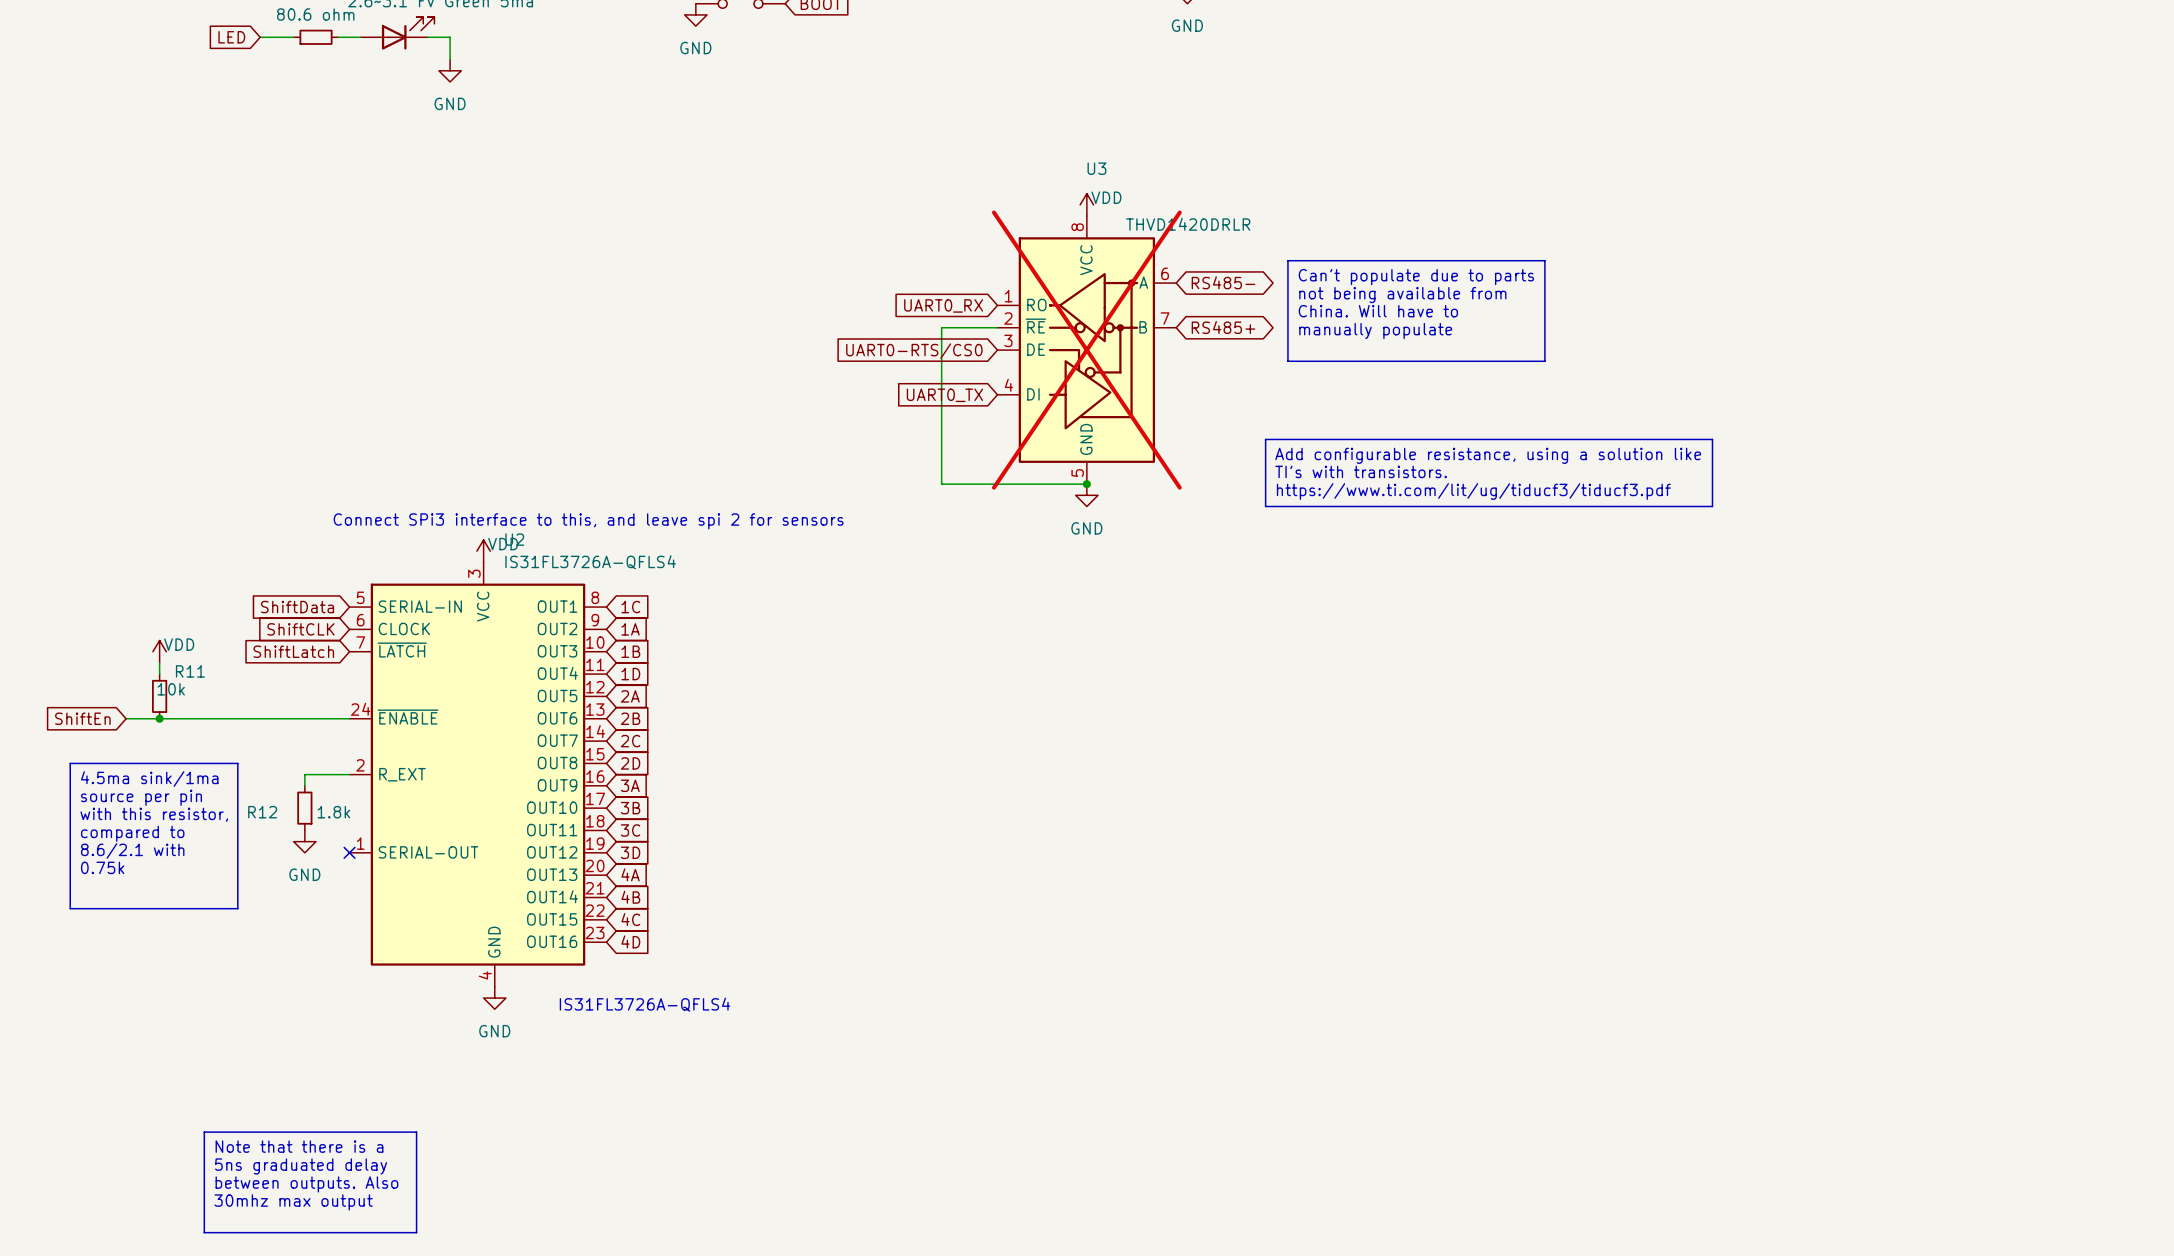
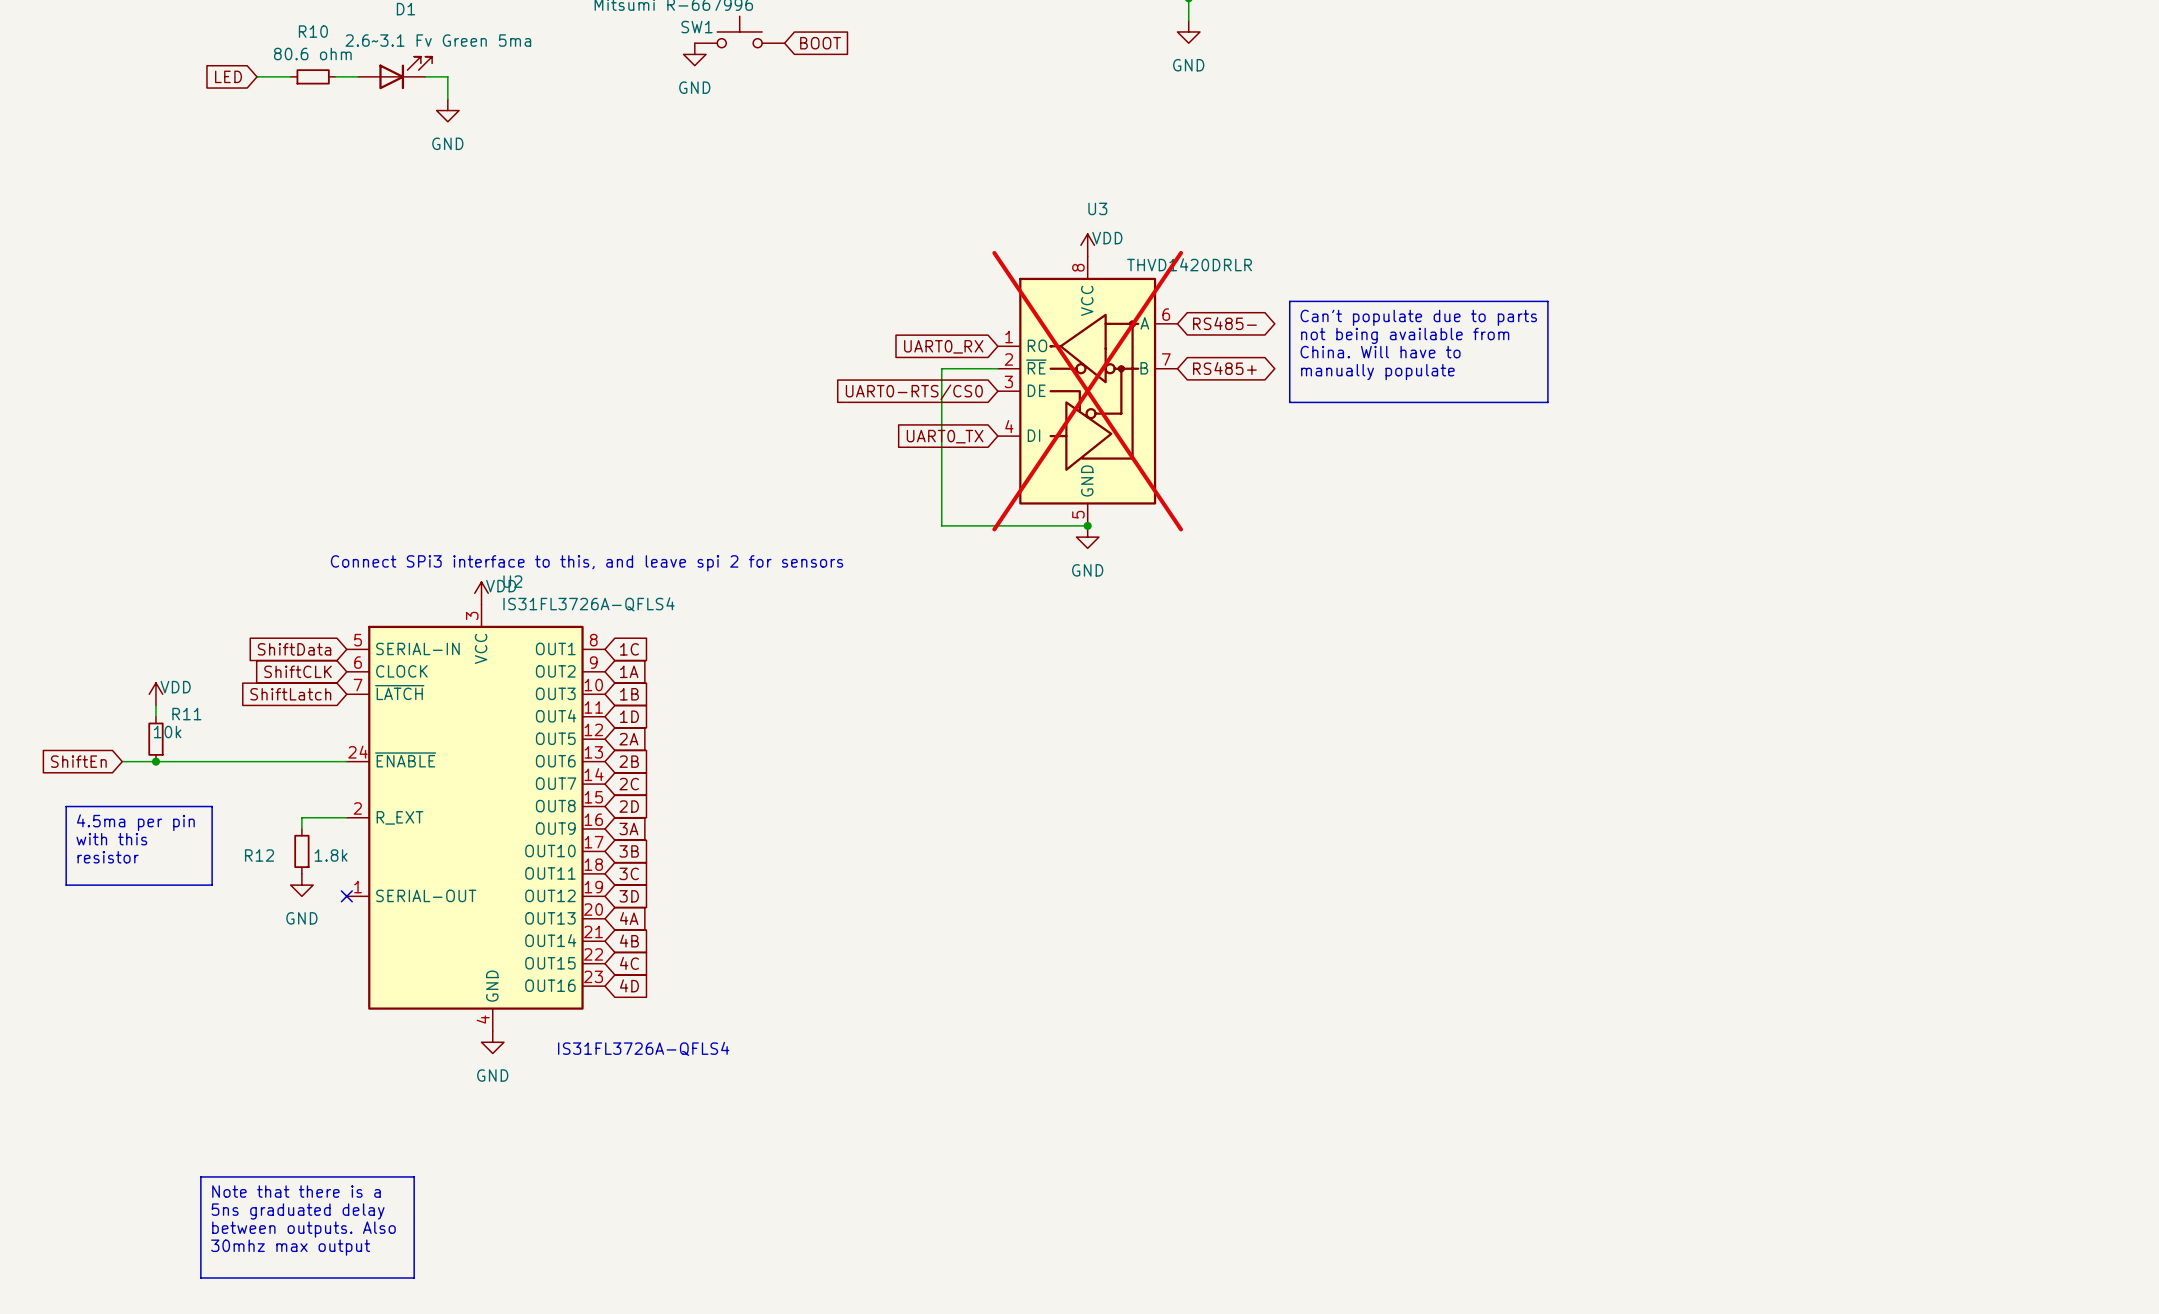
line: (1265, 439) (1712, 439) (1712, 506) (1265, 506) (1265, 439) -> none
text: Add configurable resistance, using a solution like (1488, 455) -> none
text: TI's with transistors. (1361, 471) -> none
text: https://www.ti.com/lit/ug/tiducf3/tiducf3.pdf (1473, 491) -> none
line: (215, 763) (237, 763) (237, 908) (70, 908) (70, 841) -> (212, 806) (212, 885) (66, 885)
text: 4.5ma sink/1ma (149, 779) -> 4.5ma per pin (135, 822)
text: source per pin (141, 797) -> with this (111, 839)
text: with this resistor, (154, 814) -> resistor (108, 857)
text: compared to (132, 833) -> none
text: 8.6/2.1 with (132, 850) -> none
text: 0.75k (102, 867) -> none

